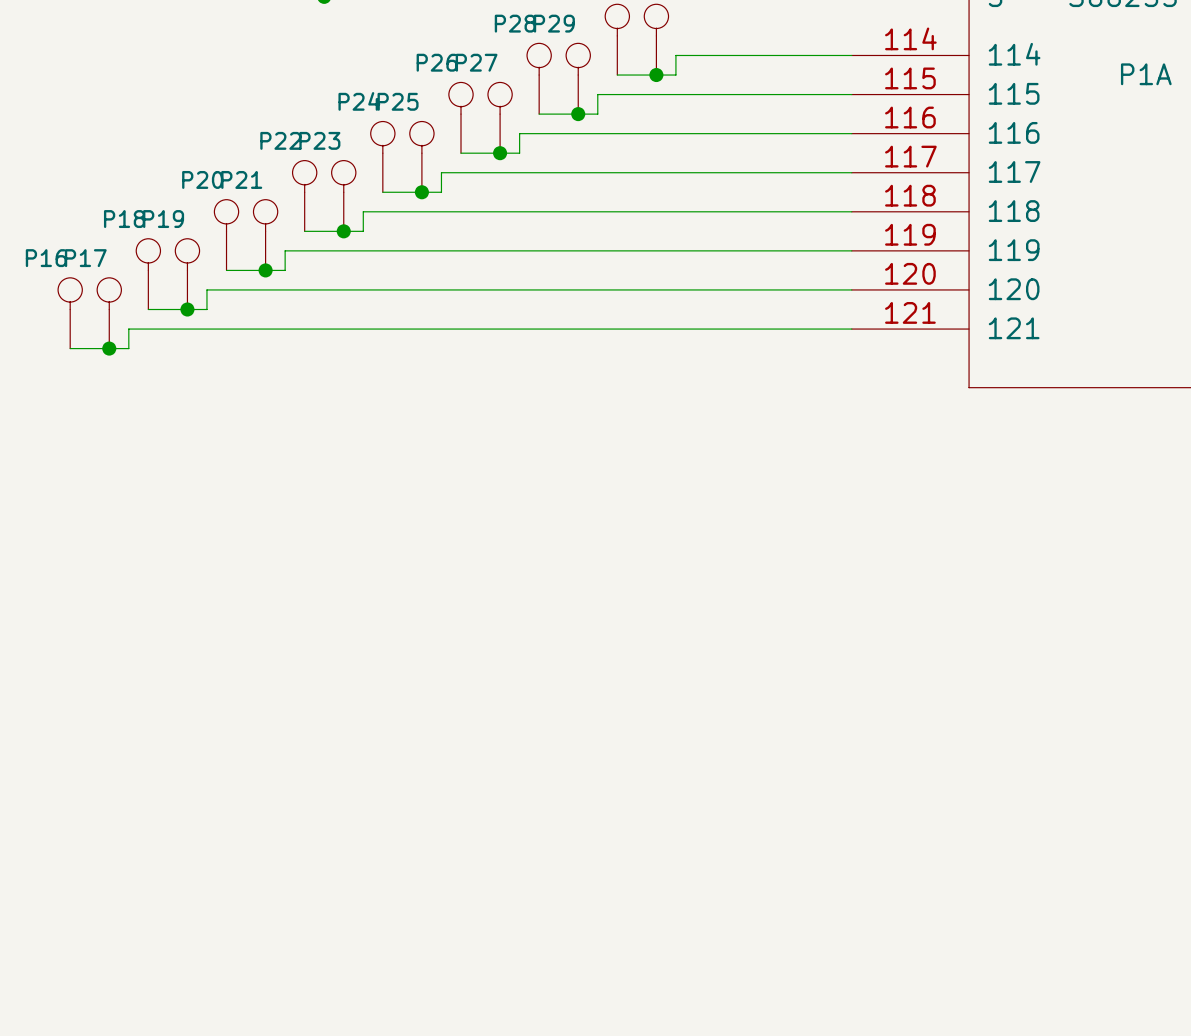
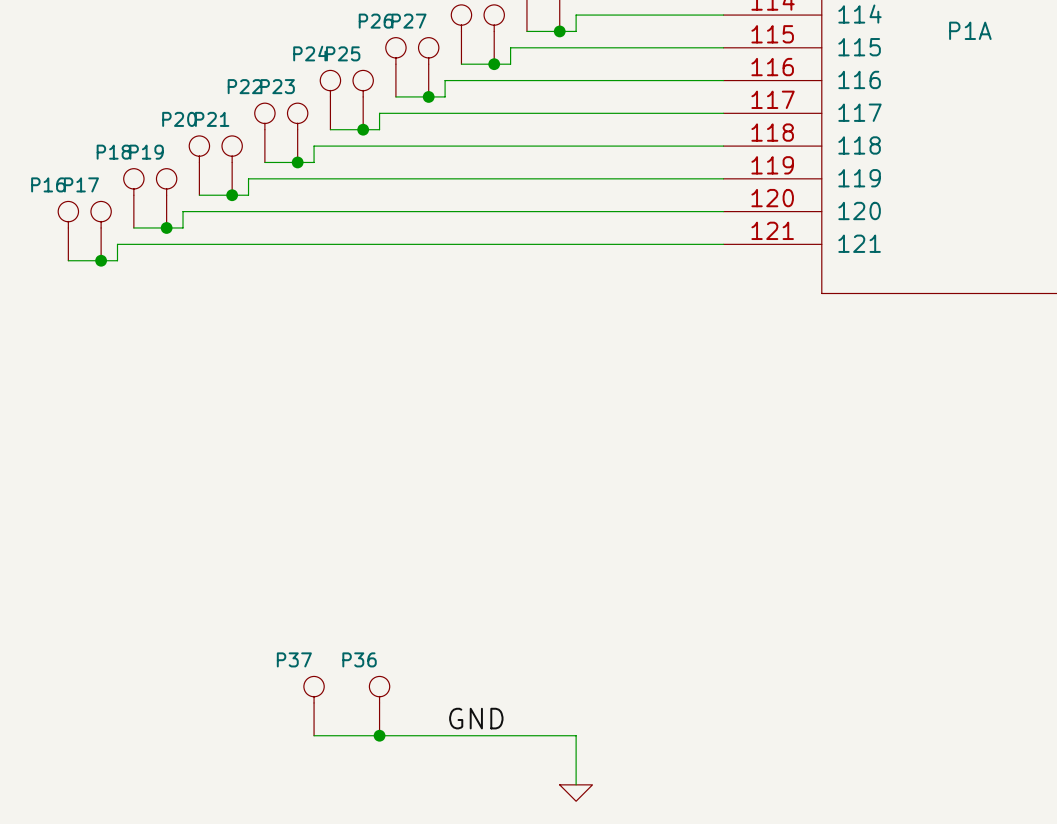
P37: none -> (314, 706)
P36: none -> (379, 706)
label: none -> GND (476, 718)
wire: none -> (314, 735) (576, 735) (576, 784)
junction: none -> (379, 735)
power symbol: none -> (576, 793)

